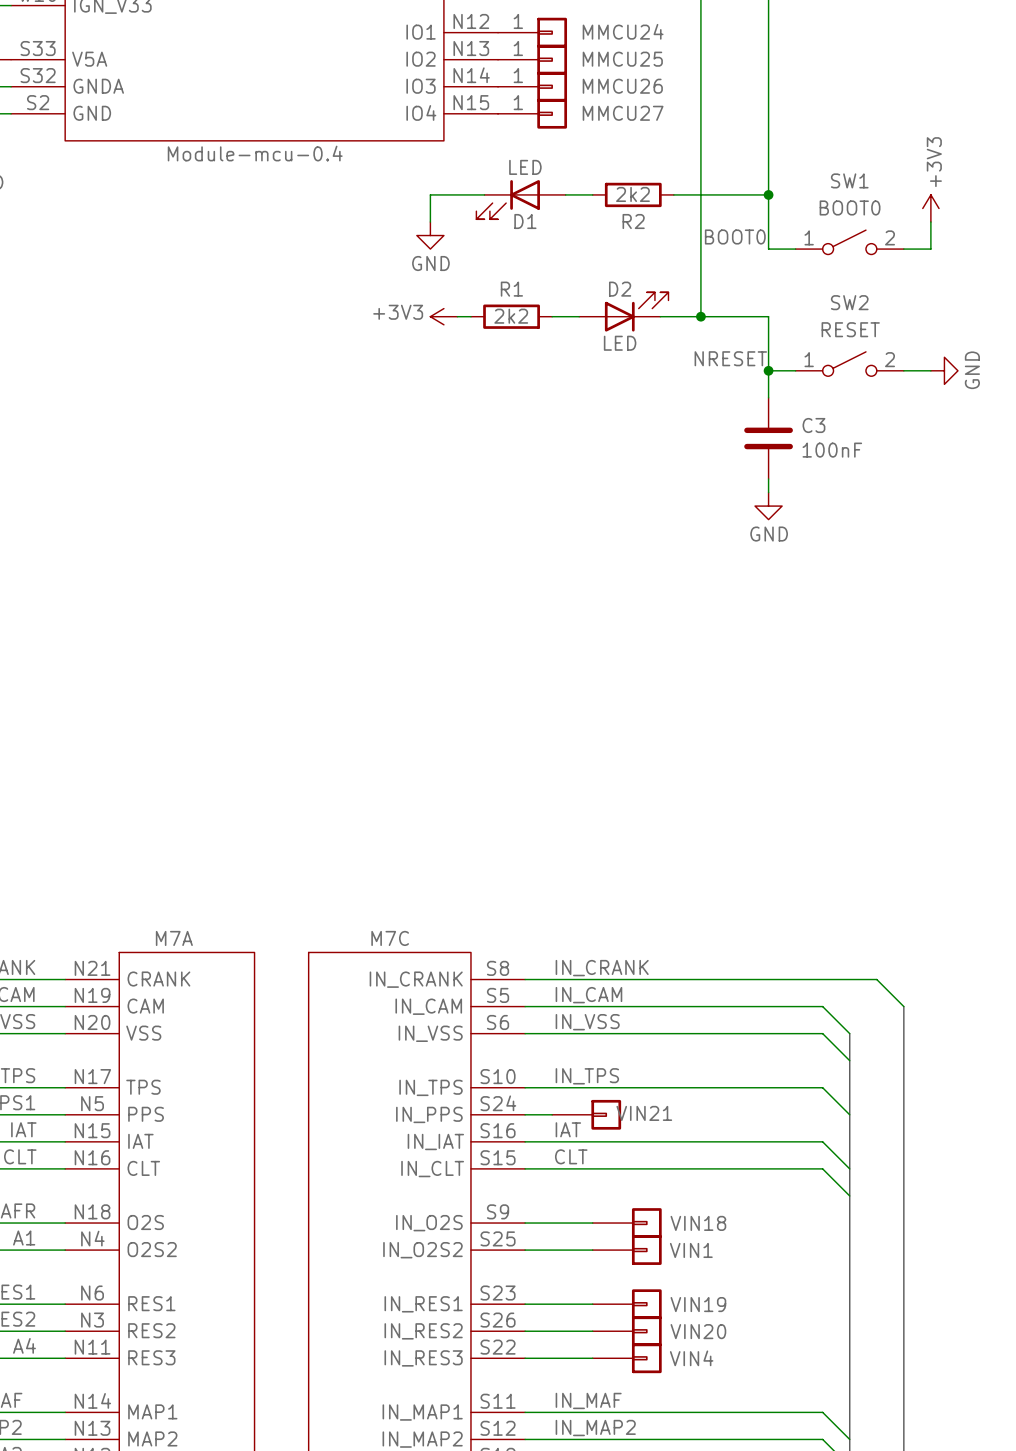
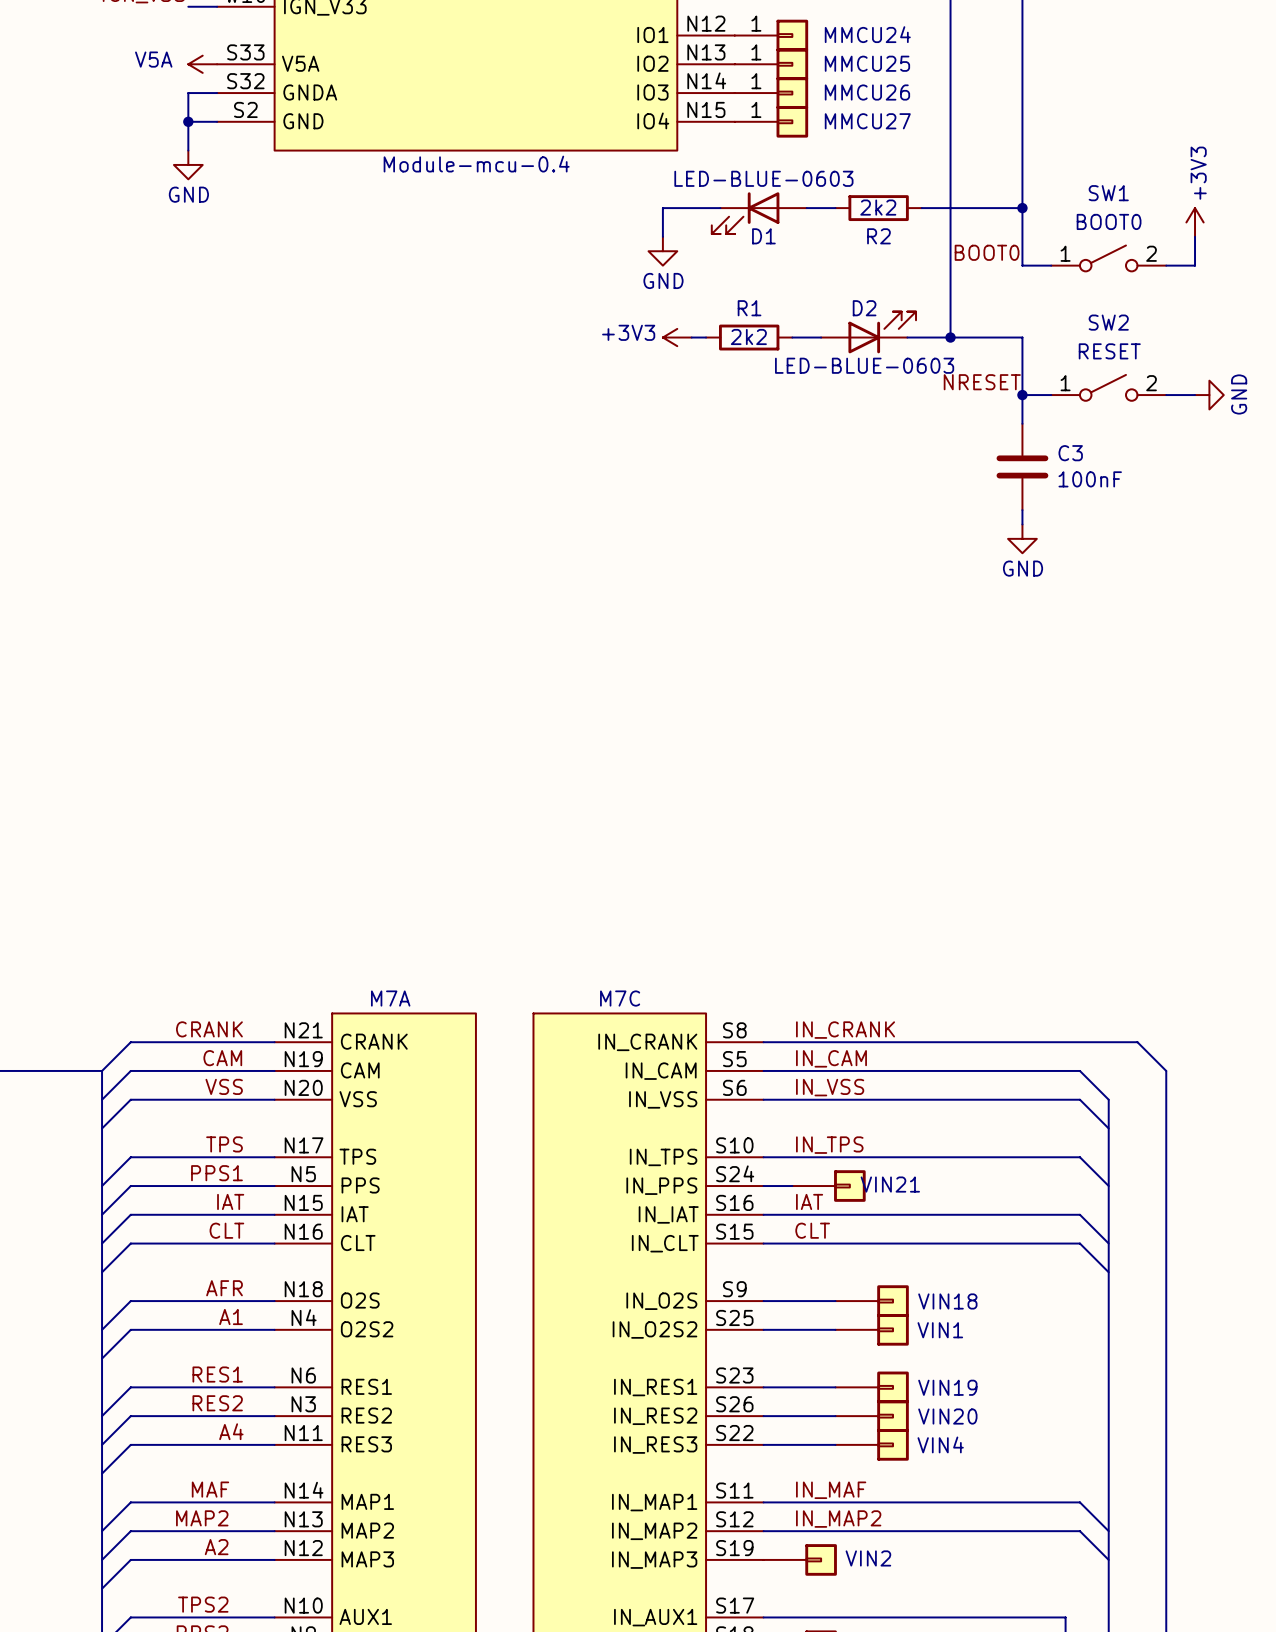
D1 value: LED (525, 167) -> LED-BLUE-0603 (763, 178)
D2 value: LED (620, 343) -> LED-BLUE-0603 (864, 365)

